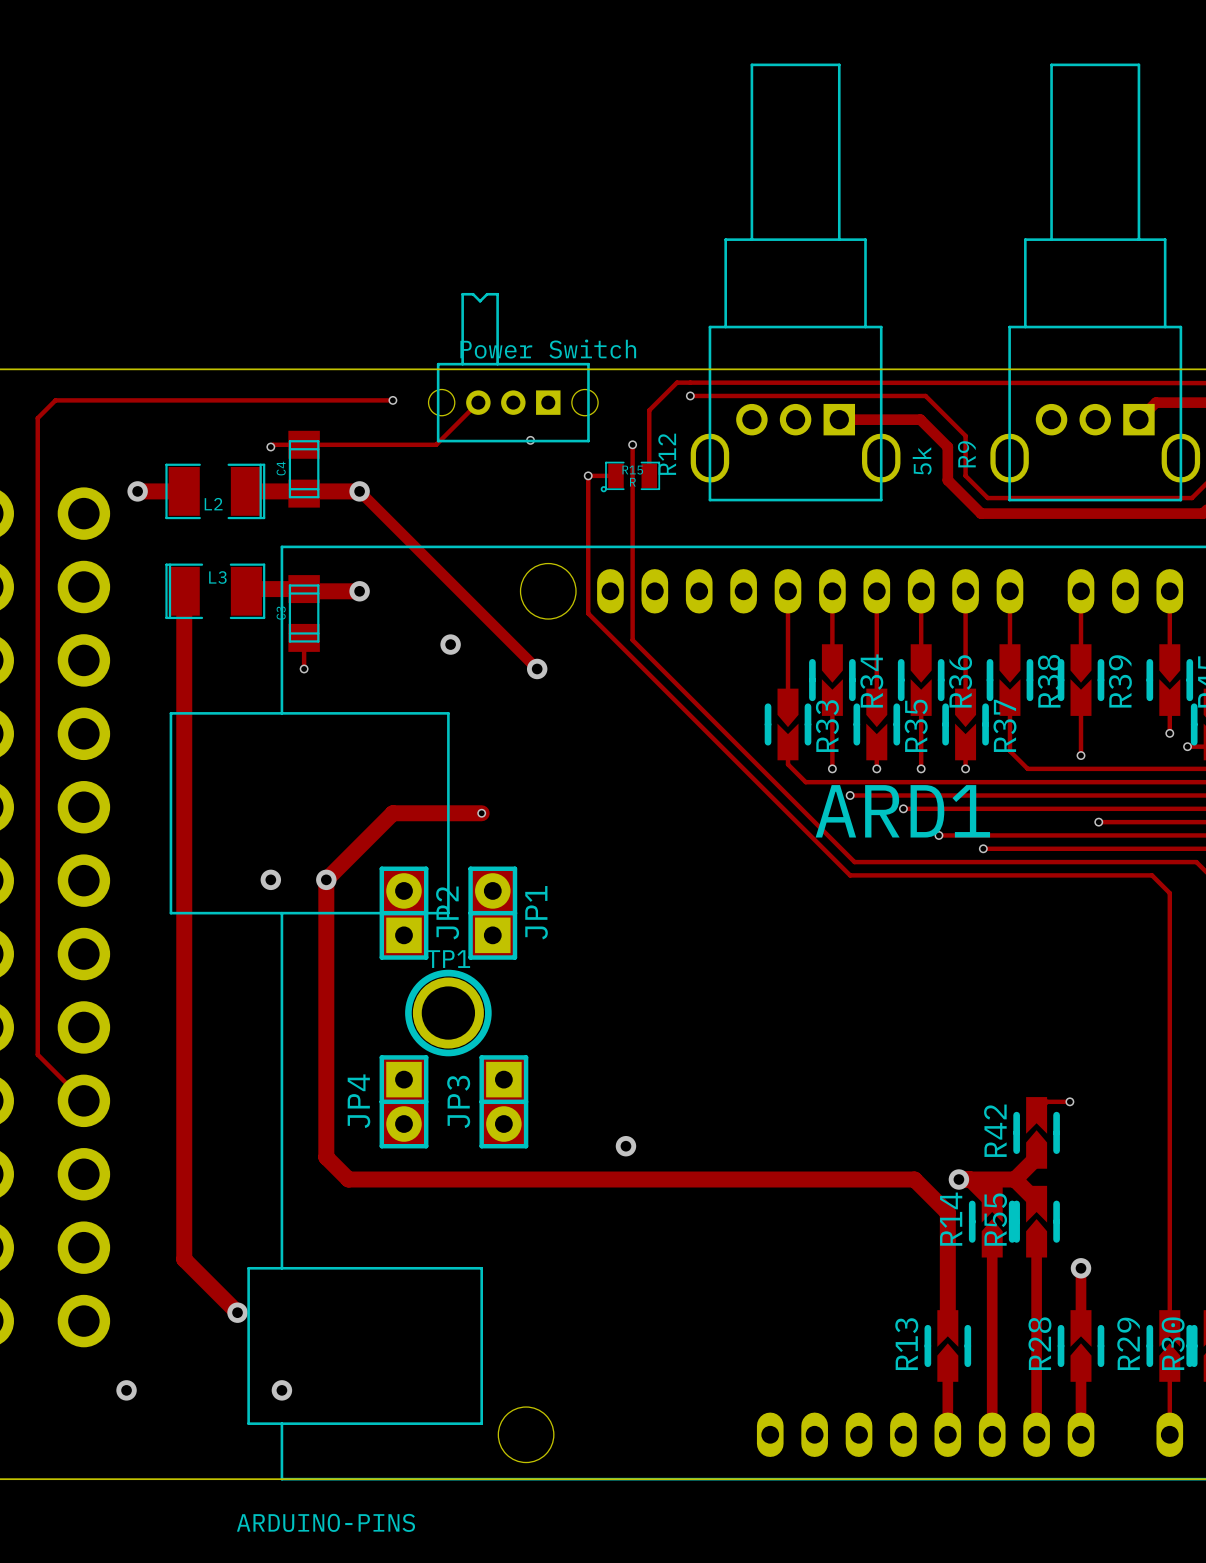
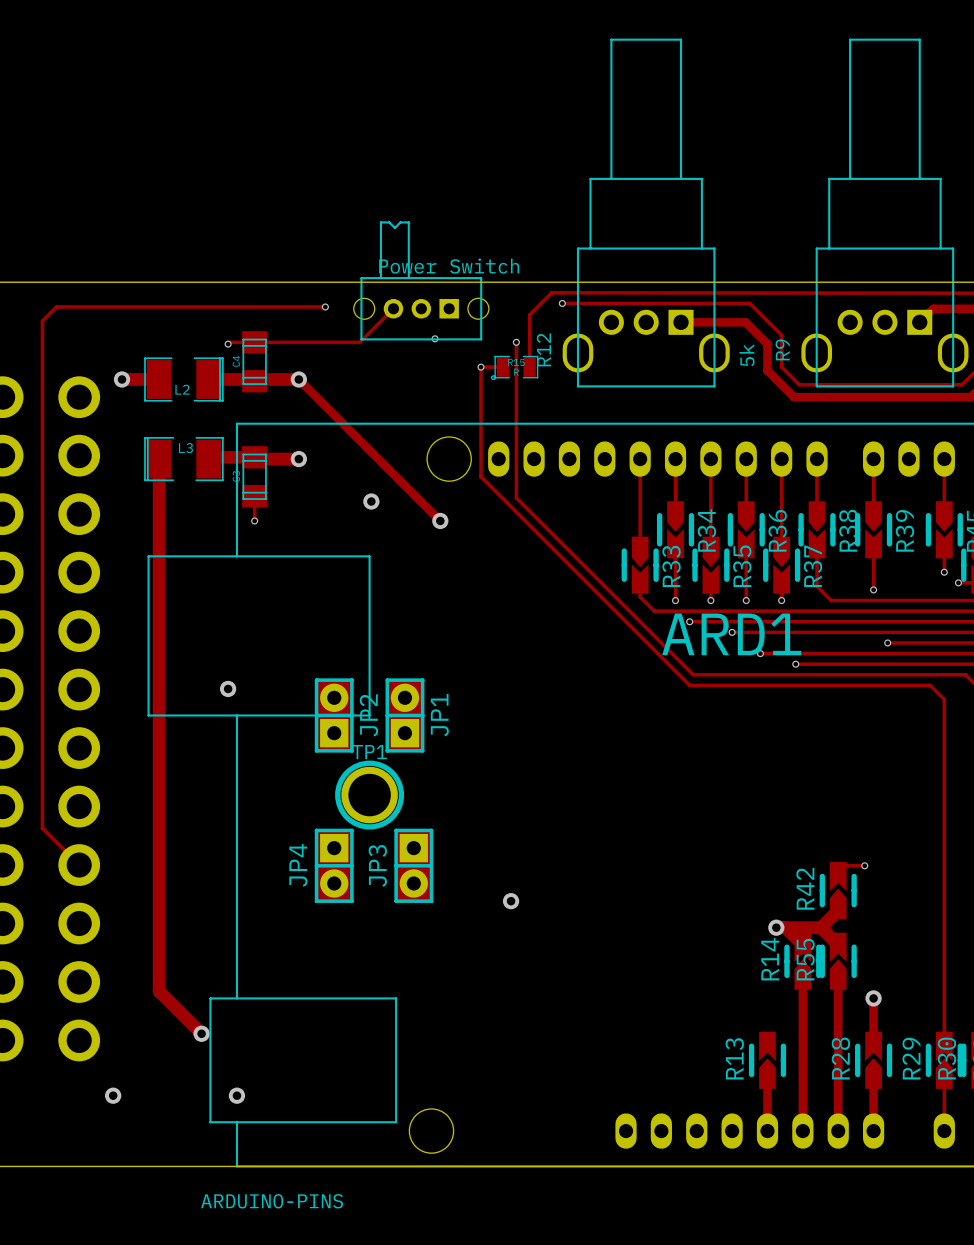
track: (481, 813) (392, 813) (326, 879) (326, 1157) (348, 1179) (914, 1179) (947, 1212) (947, 1323) -> none
via: (481, 813) -> none
via: (326, 879) -> none

